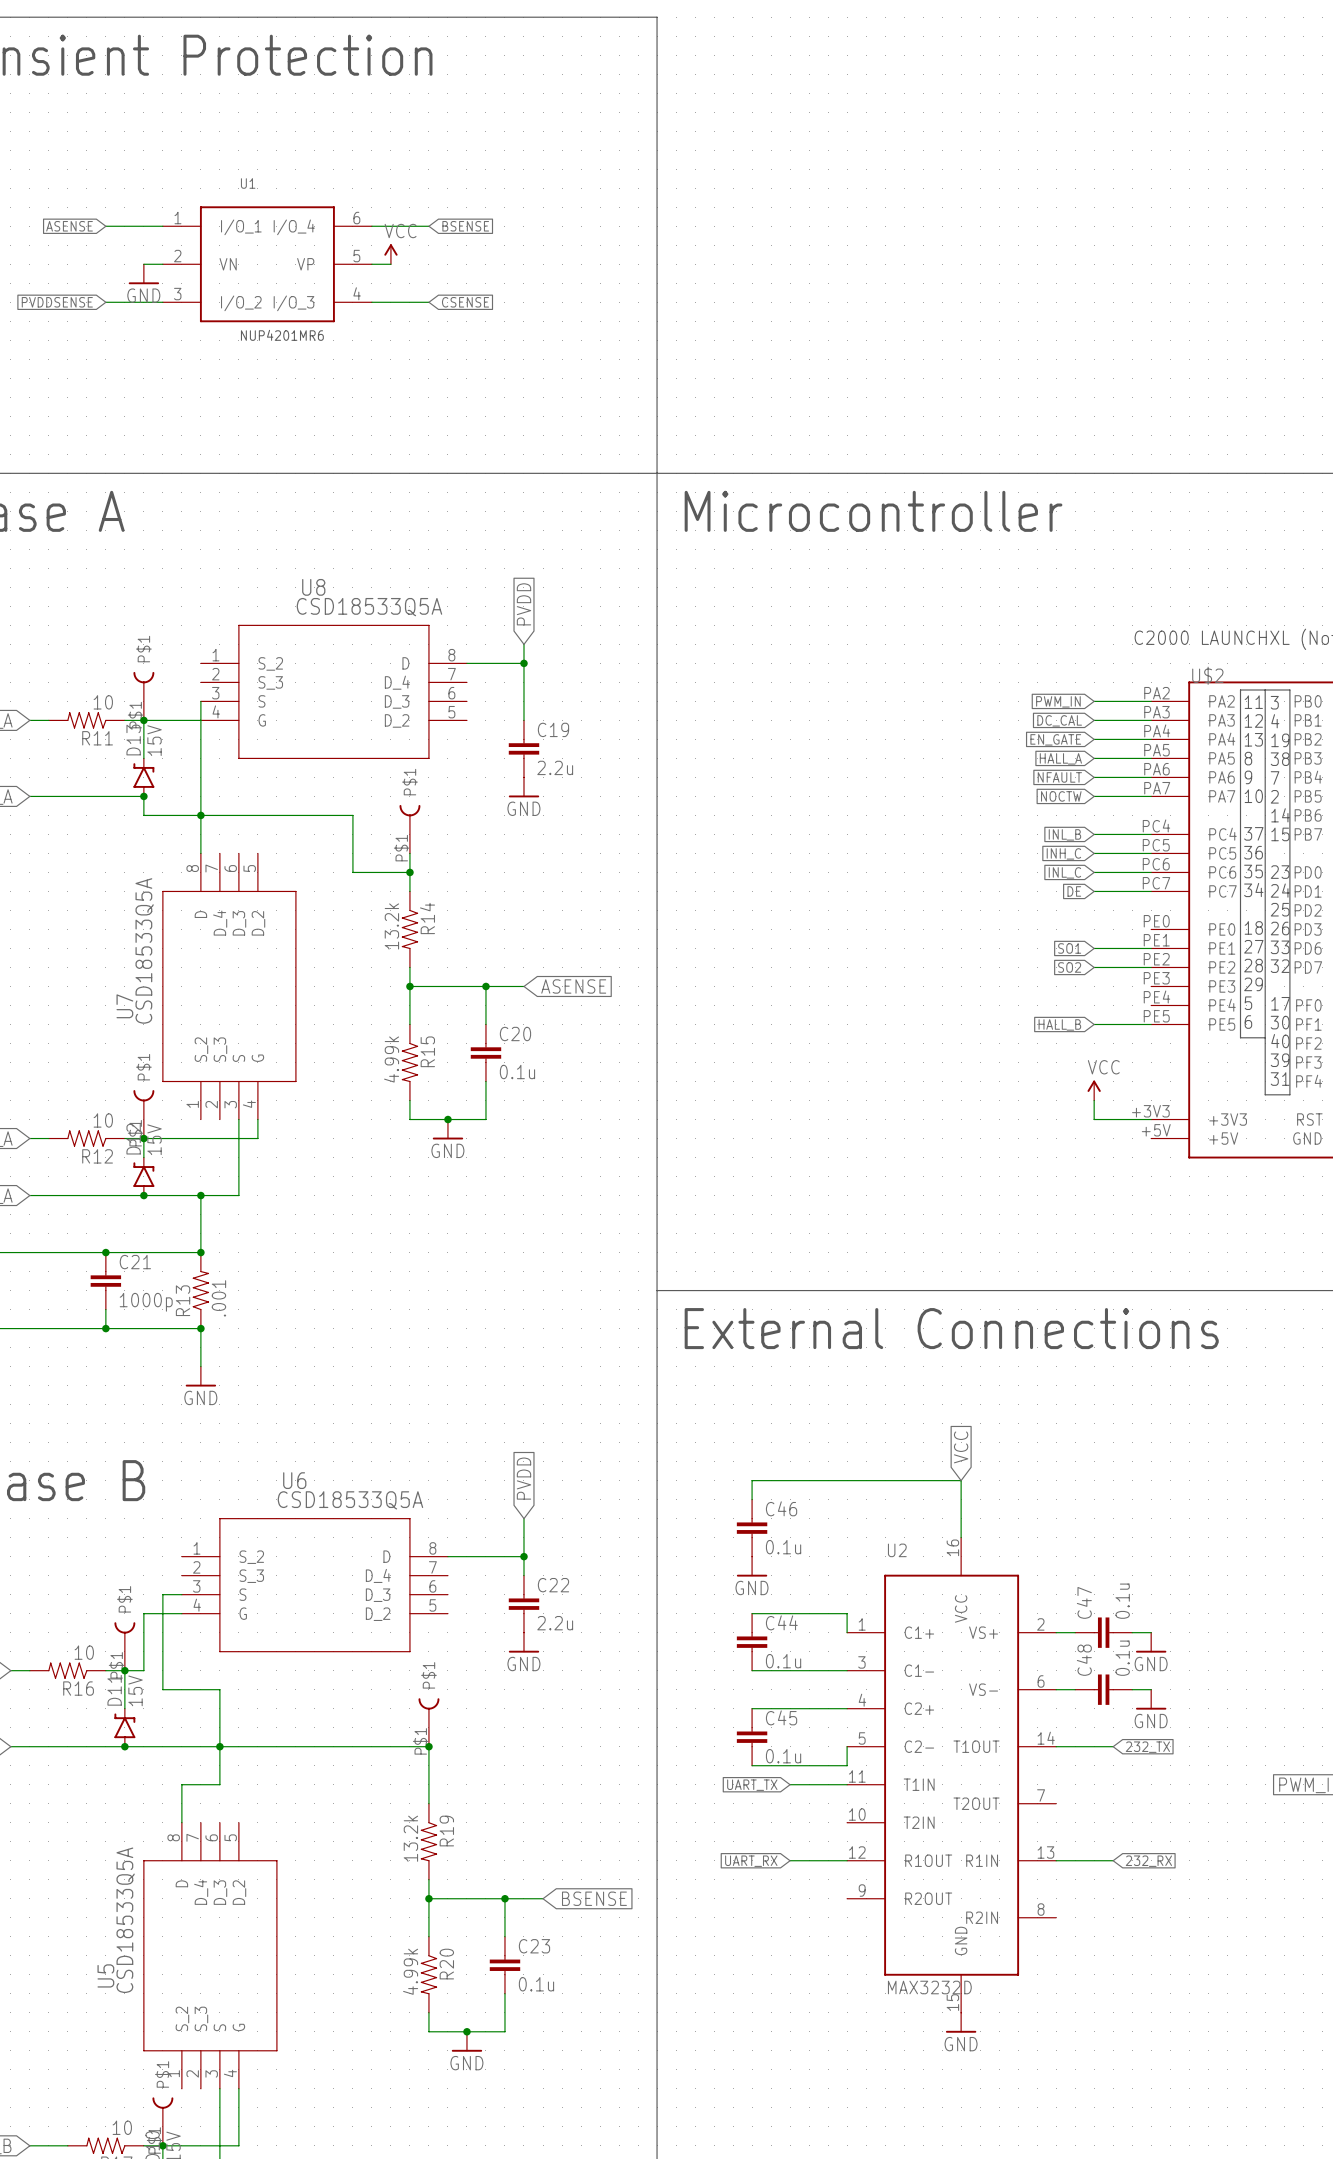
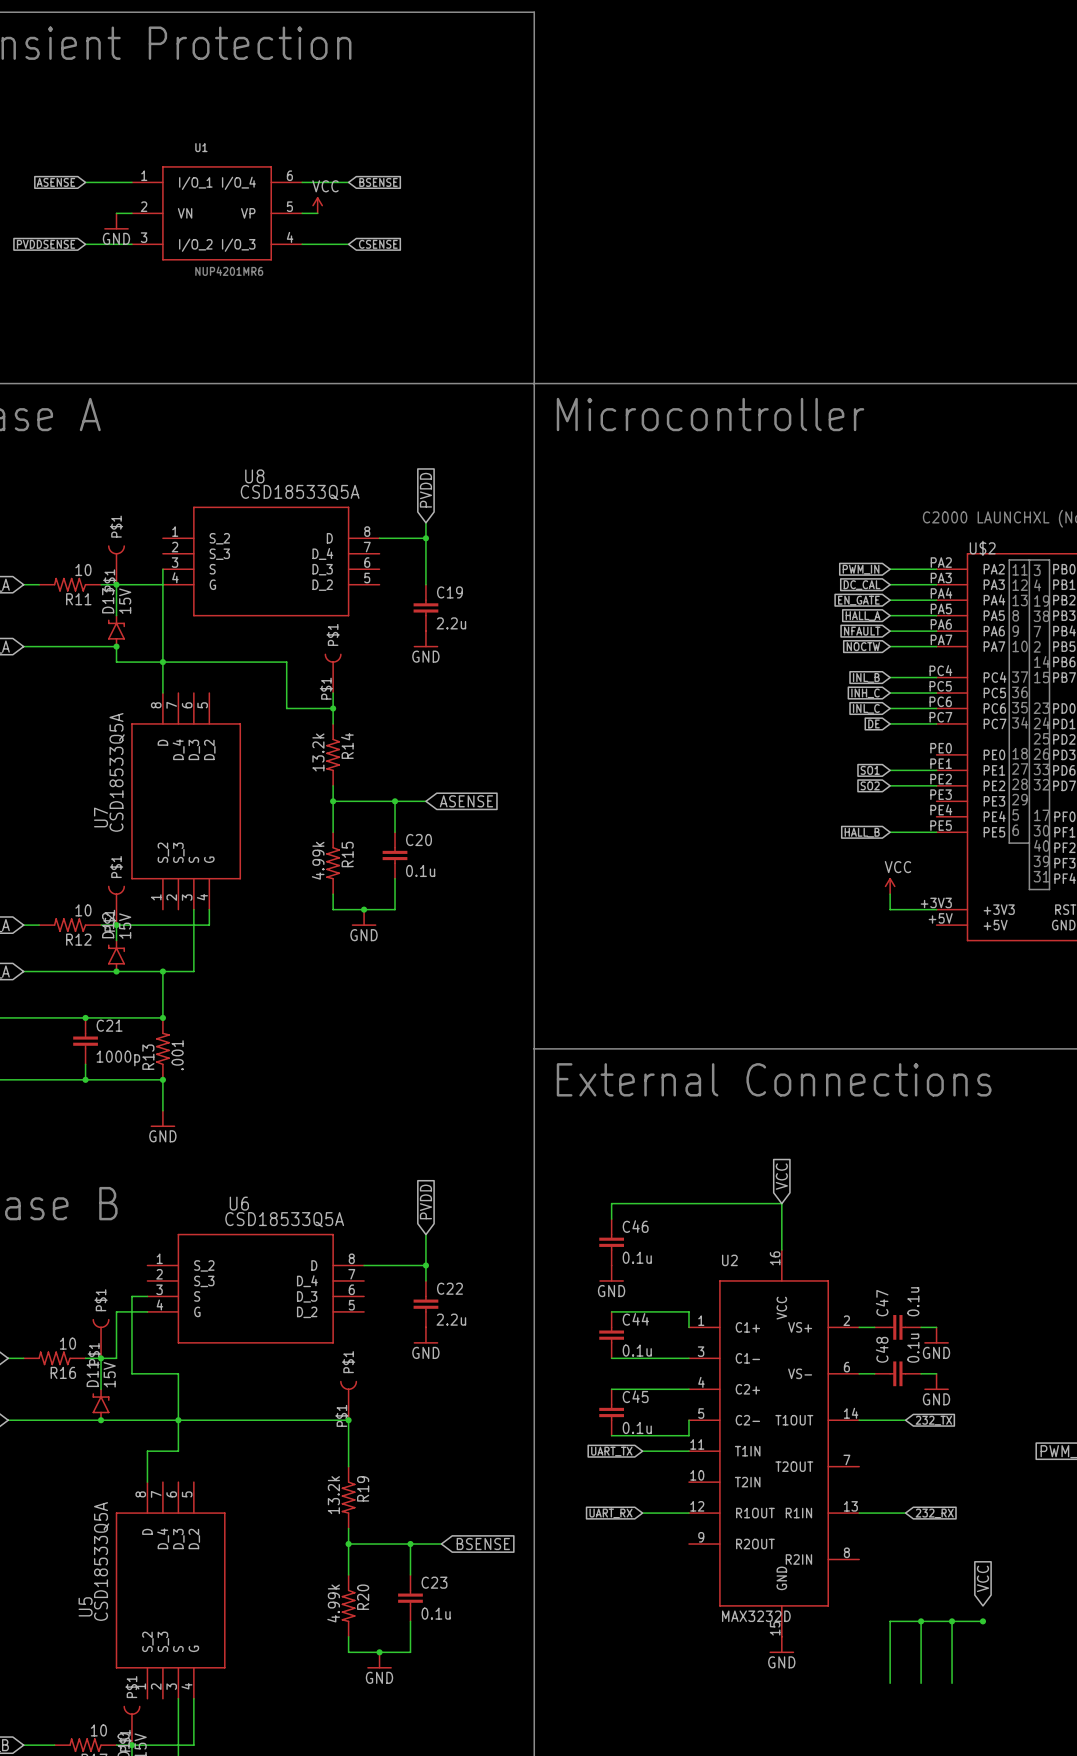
global label: none -> VCC (982, 1578)
wire: none -> (921, 1621) (921, 1683)
junction: none -> (921, 1621)
wire: none -> (952, 1621) (952, 1683)
junction: none -> (952, 1621)
wire: none -> (982, 1621) (890, 1621) (890, 1683)
junction: none -> (982, 1621)

